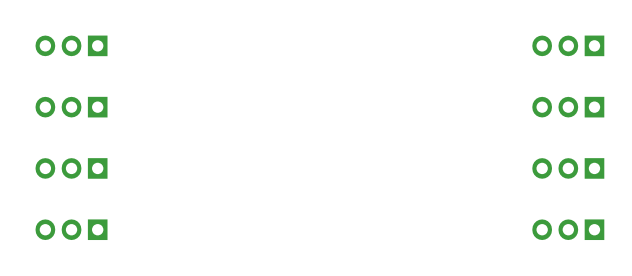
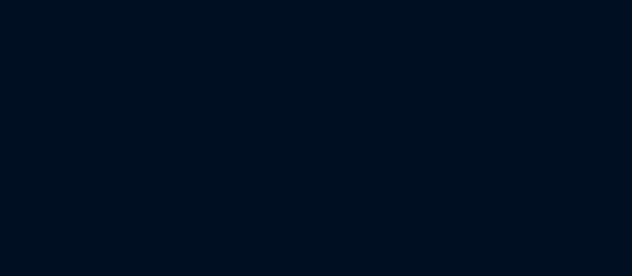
part: (71, 45) -> none
part: (568, 45) -> none
part: (71, 107) -> none
part: (568, 107) -> none
part: (71, 168) -> none
part: (568, 168) -> none
part: (71, 229) -> none
part: (568, 229) -> none

